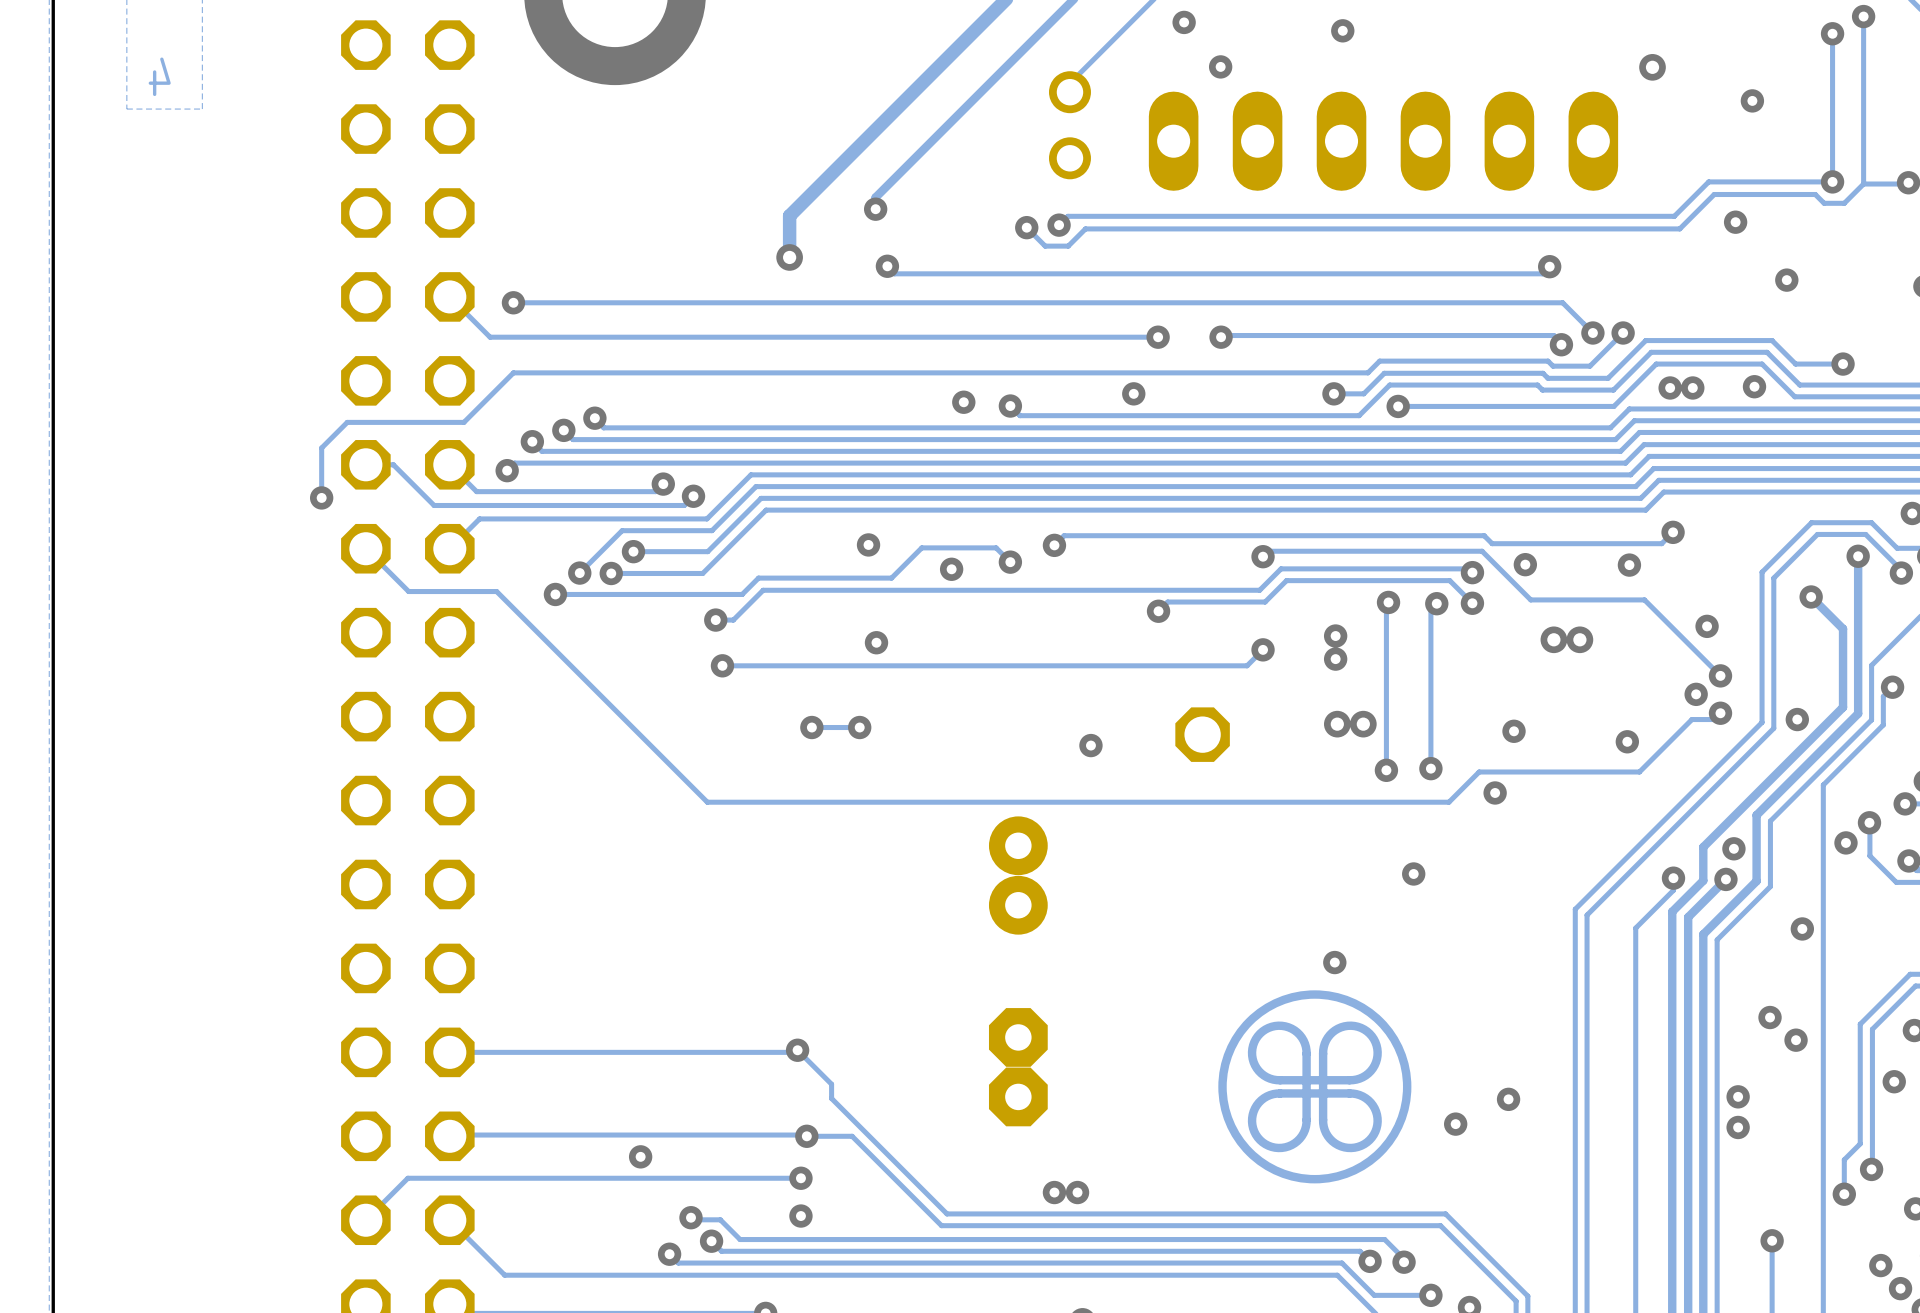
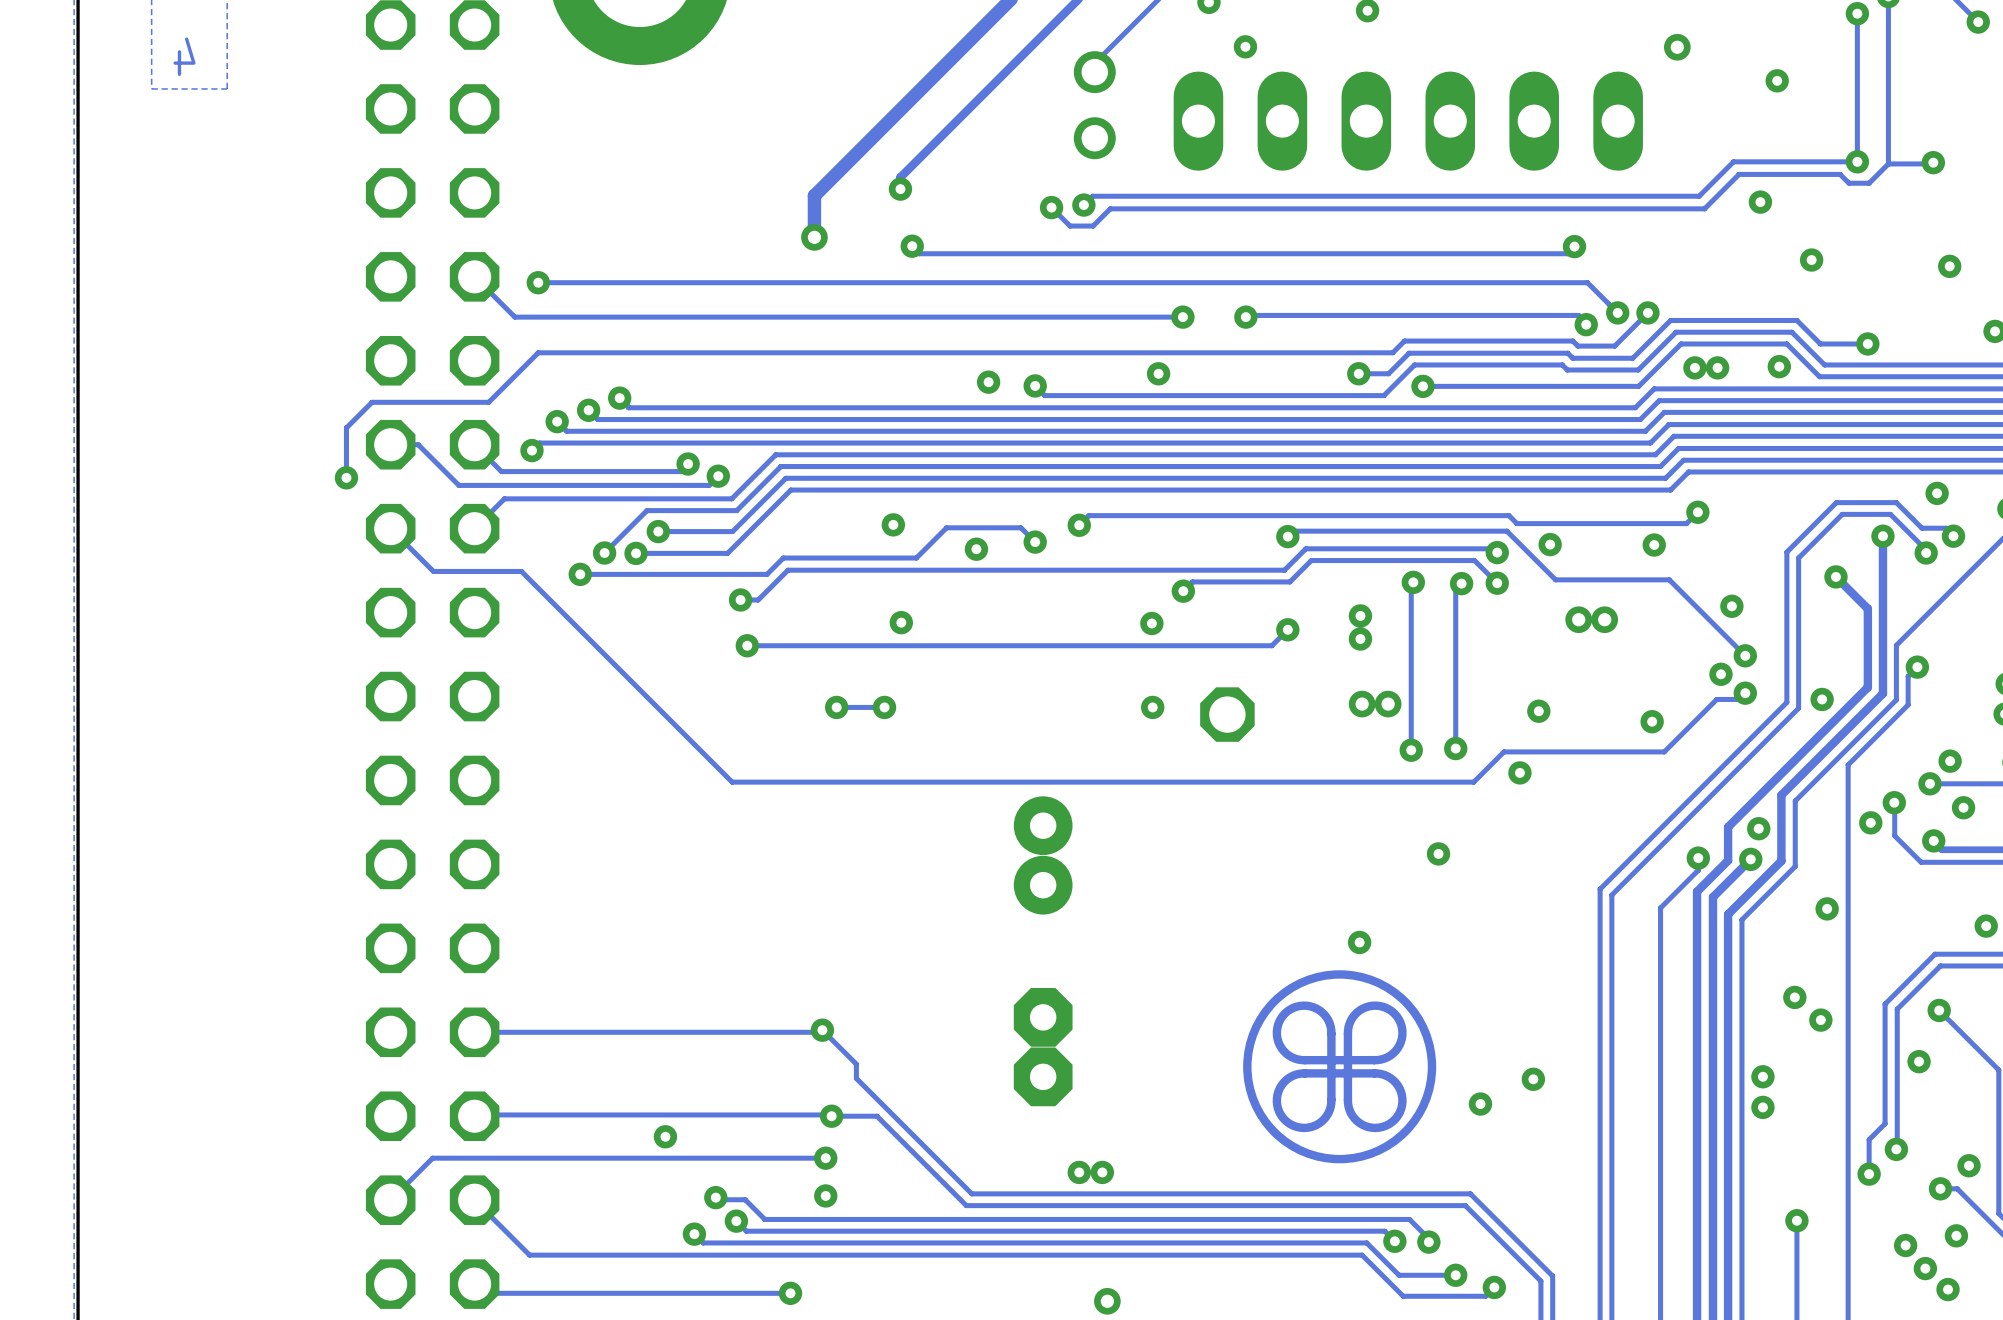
via: none -> (1151, 623)
via position: (1090, 745) -> (1152, 707)

